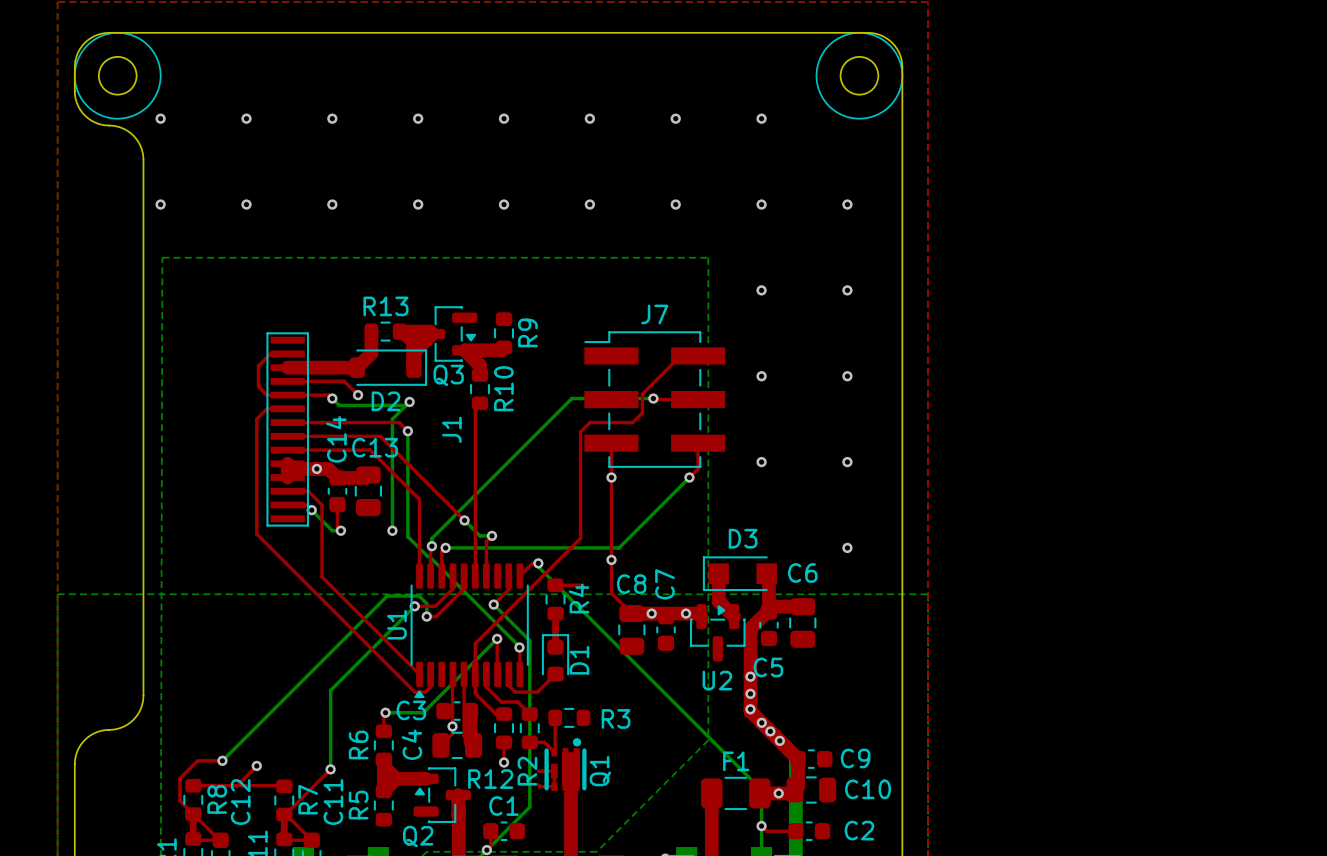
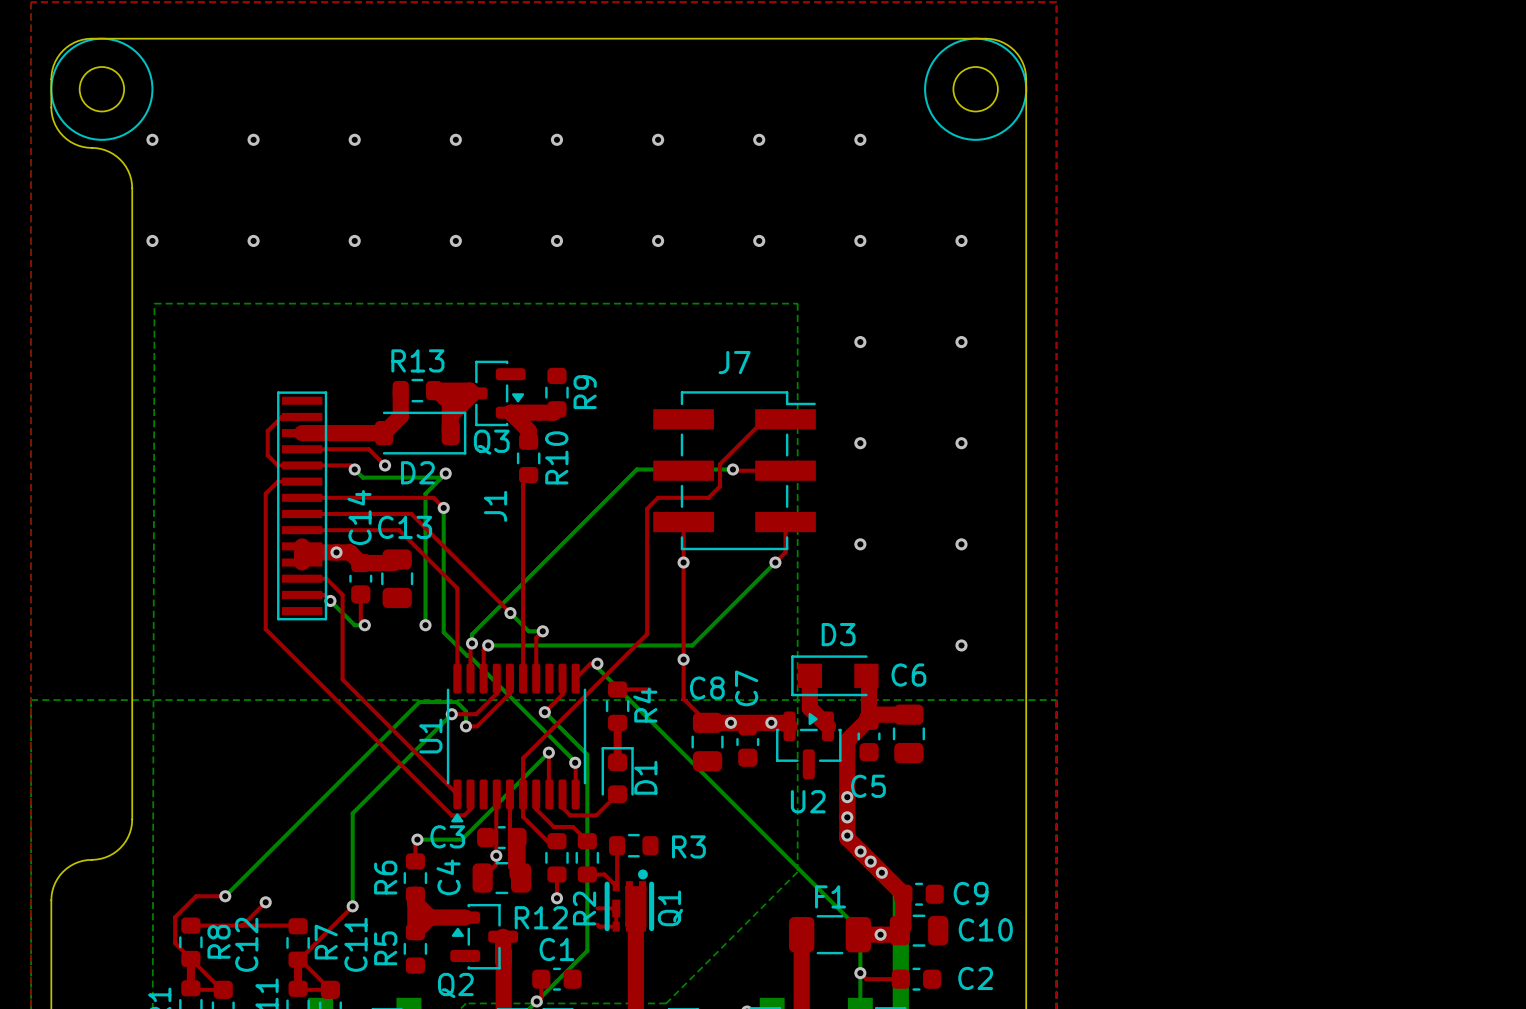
J7 footprint: [584, 331, 726, 468] -> [653, 391, 816, 551]

